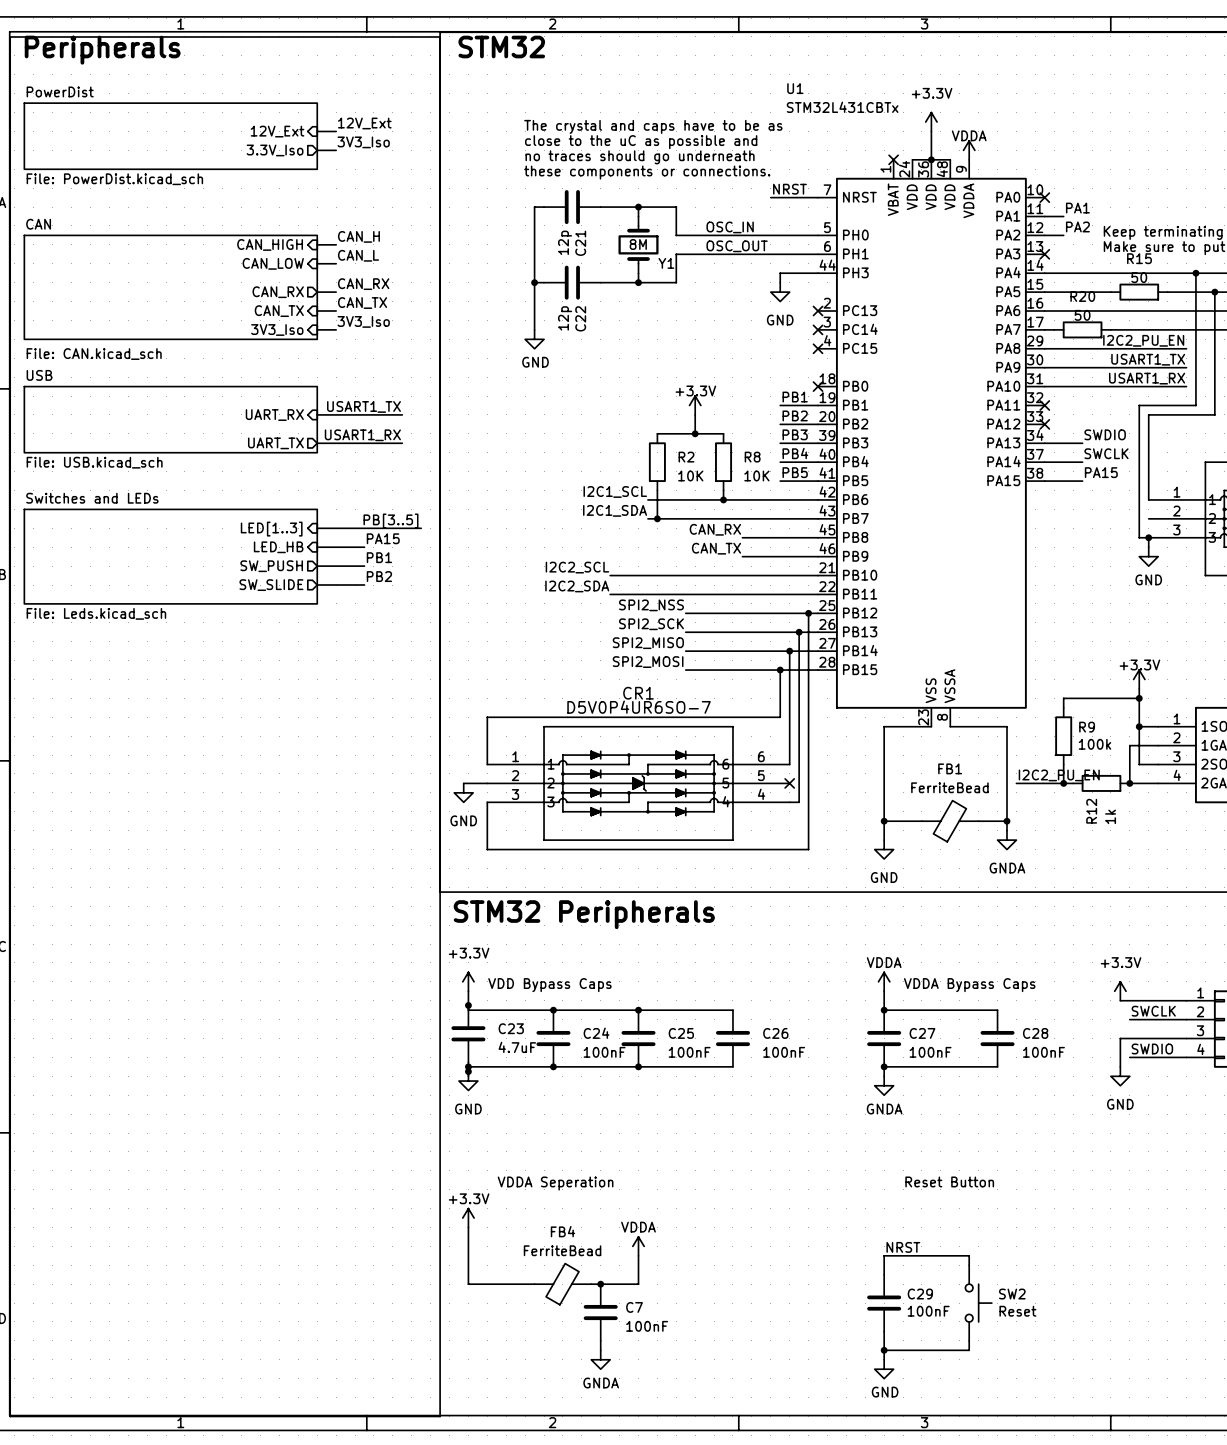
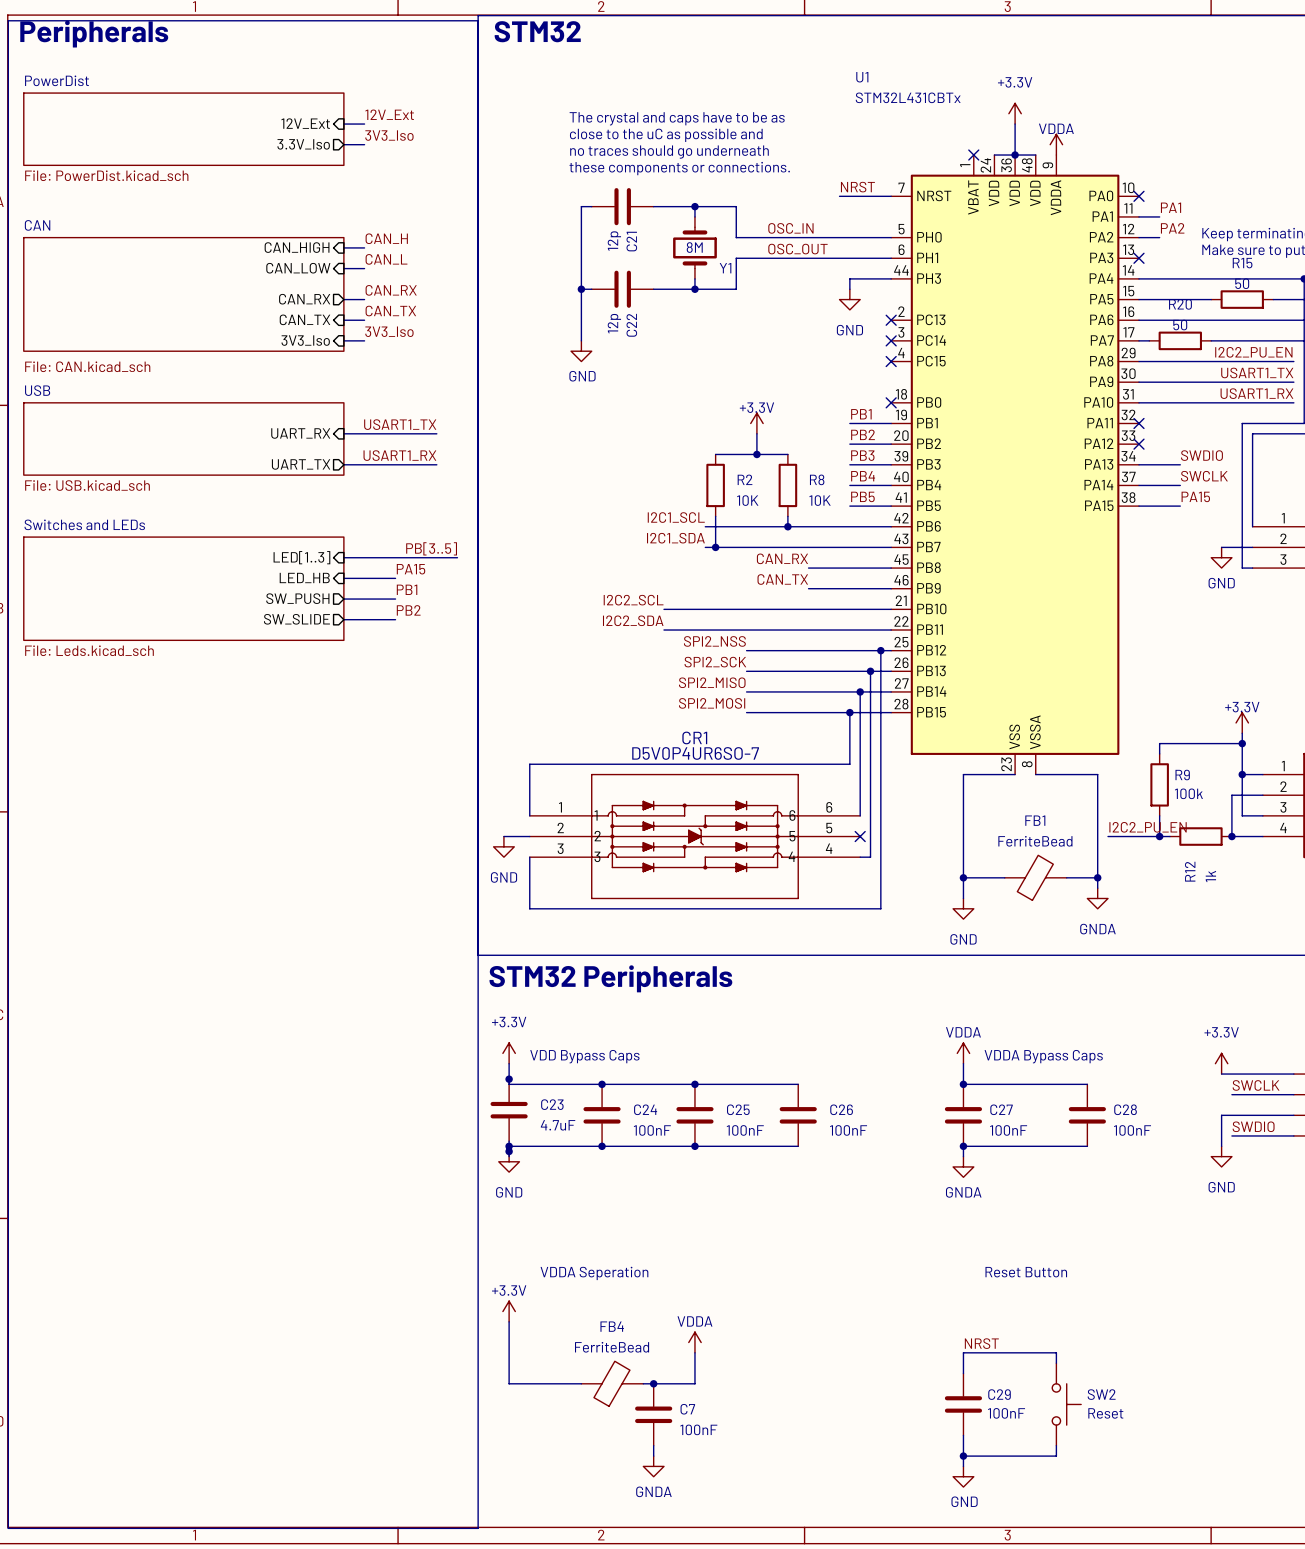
wire: none -> (1221, 547) (1252, 547)
wire: (1148, 537) (1148, 547) -> none
junction: (1148, 537) -> none
power symbol position: GND (1148, 556) -> GND (1221, 557)

